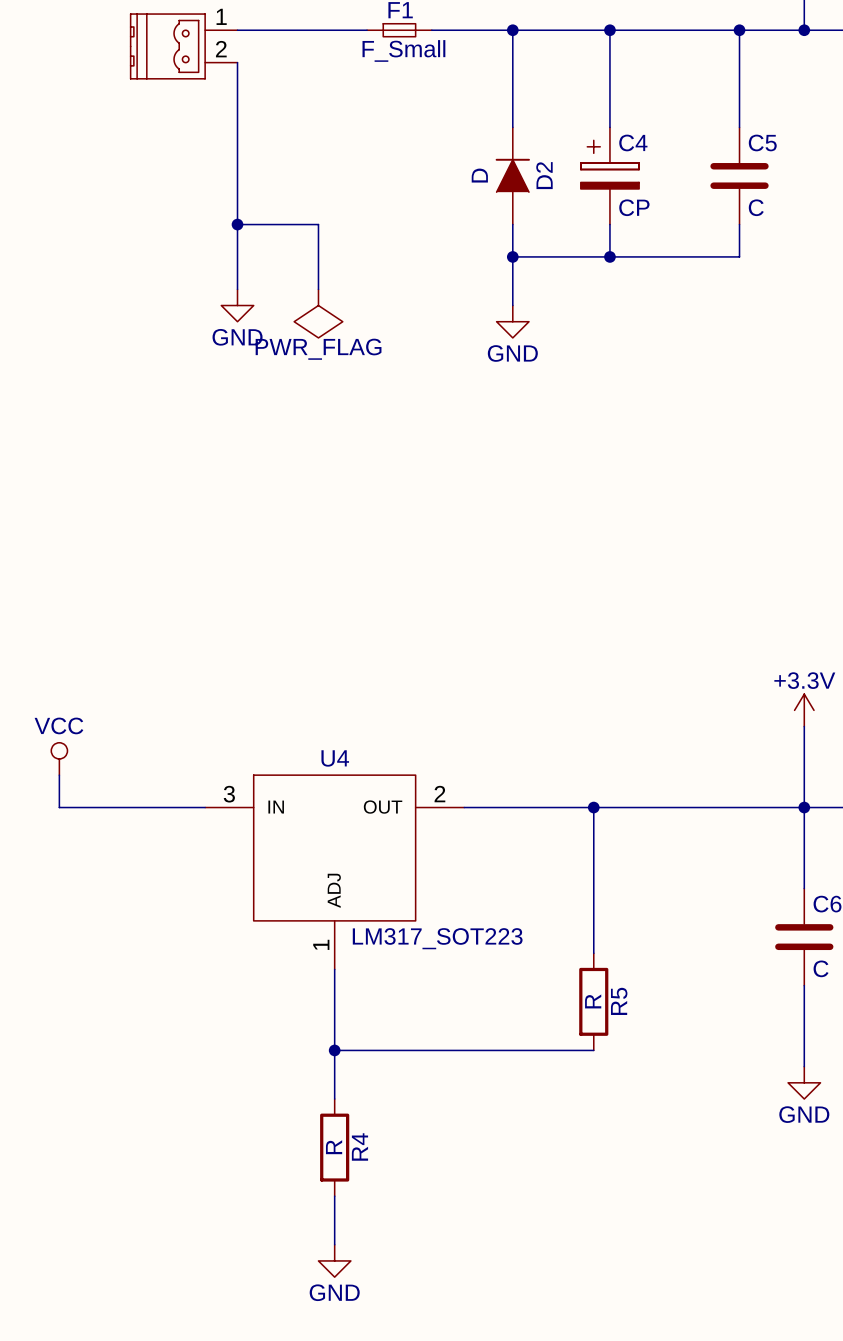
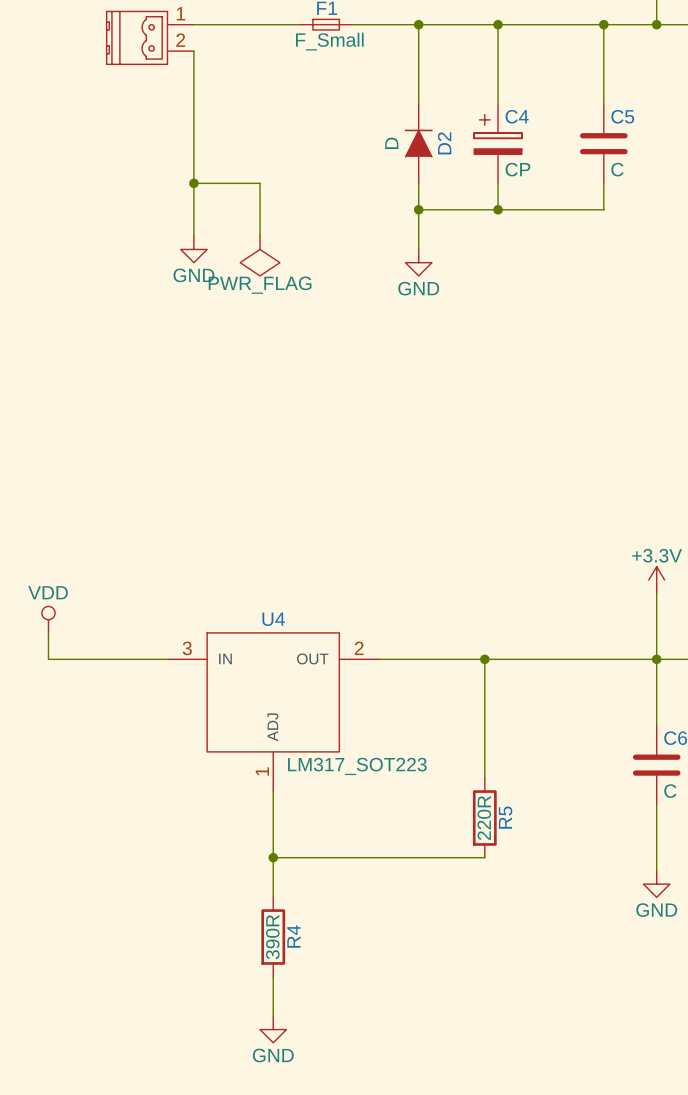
power symbol: VCC (59, 758) -> VDD (48, 619)
R5 value: R (593, 1001) -> 220R (484, 817)
R4 value: R (334, 1147) -> 390R (272, 937)

